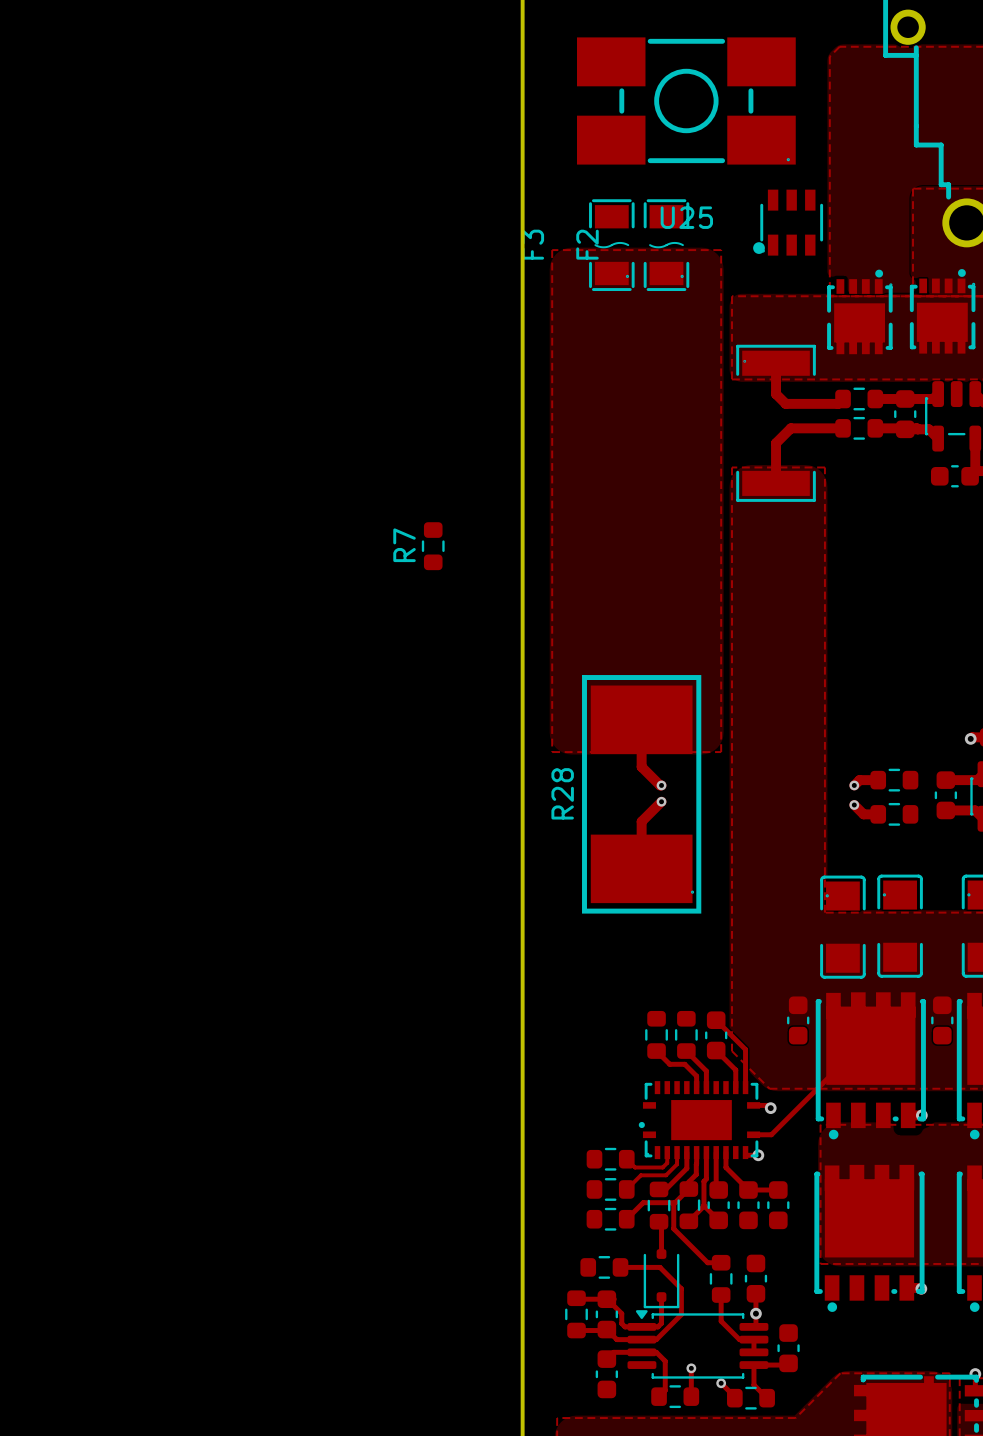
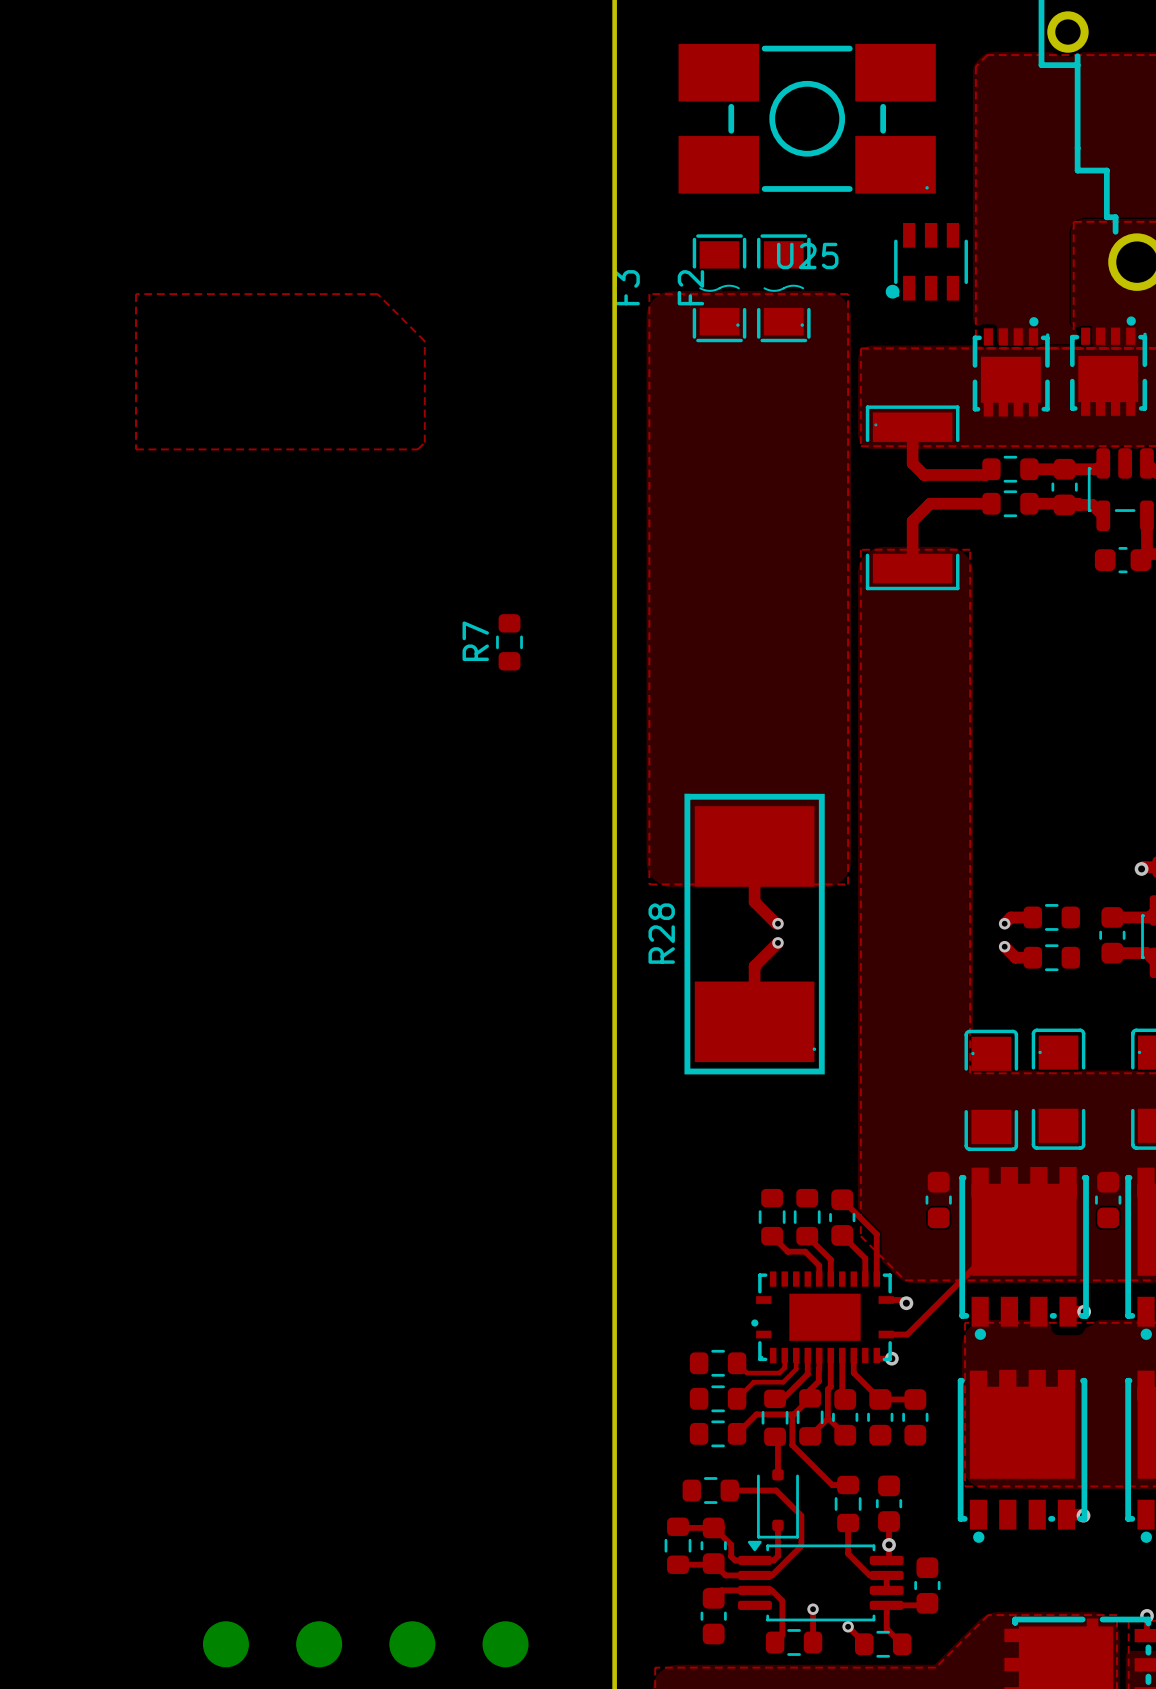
top zone outline: none -> (136, 294) (136, 449) (417, 449) (424, 442) (424, 341) (377, 294) (136, 294)
part: none -> (225, 1644)
part: none -> (319, 1644)
part: none -> (412, 1644)
part: none -> (505, 1644)

